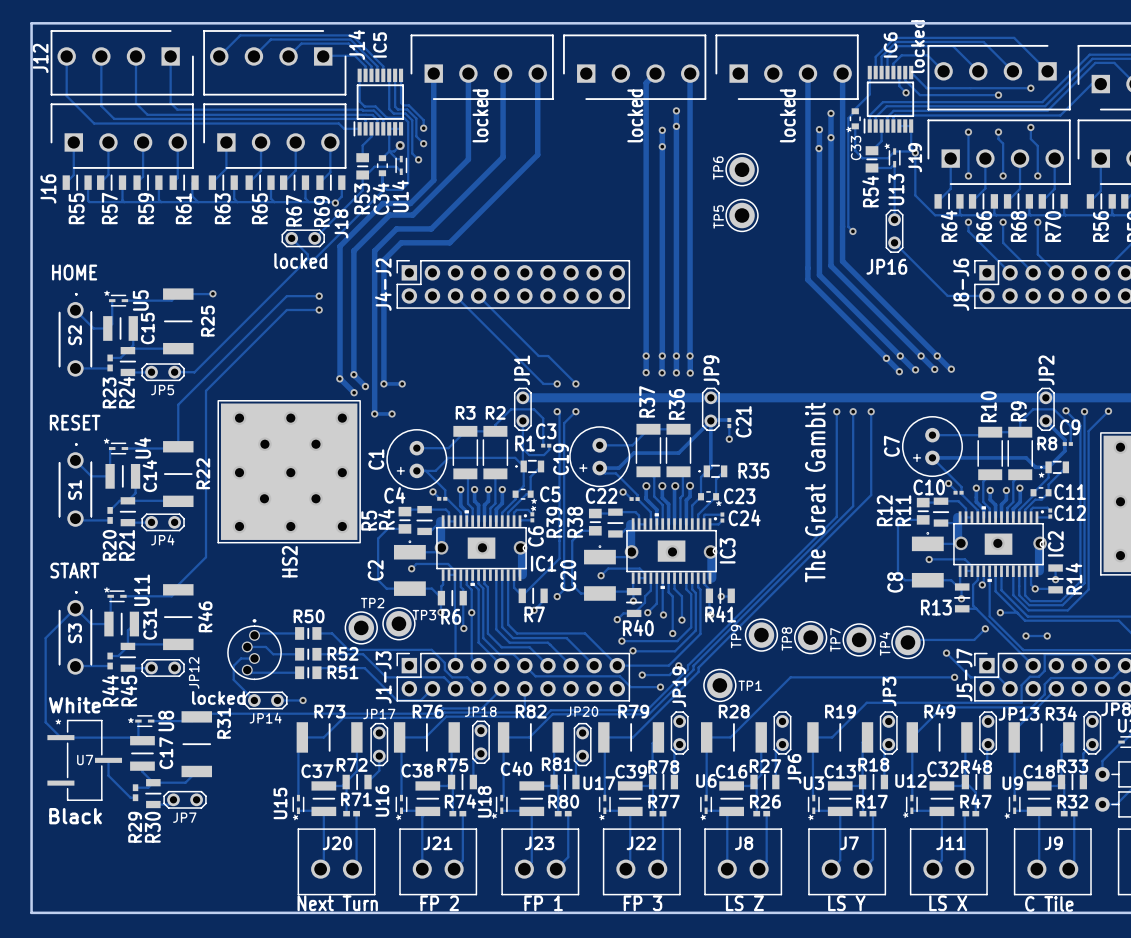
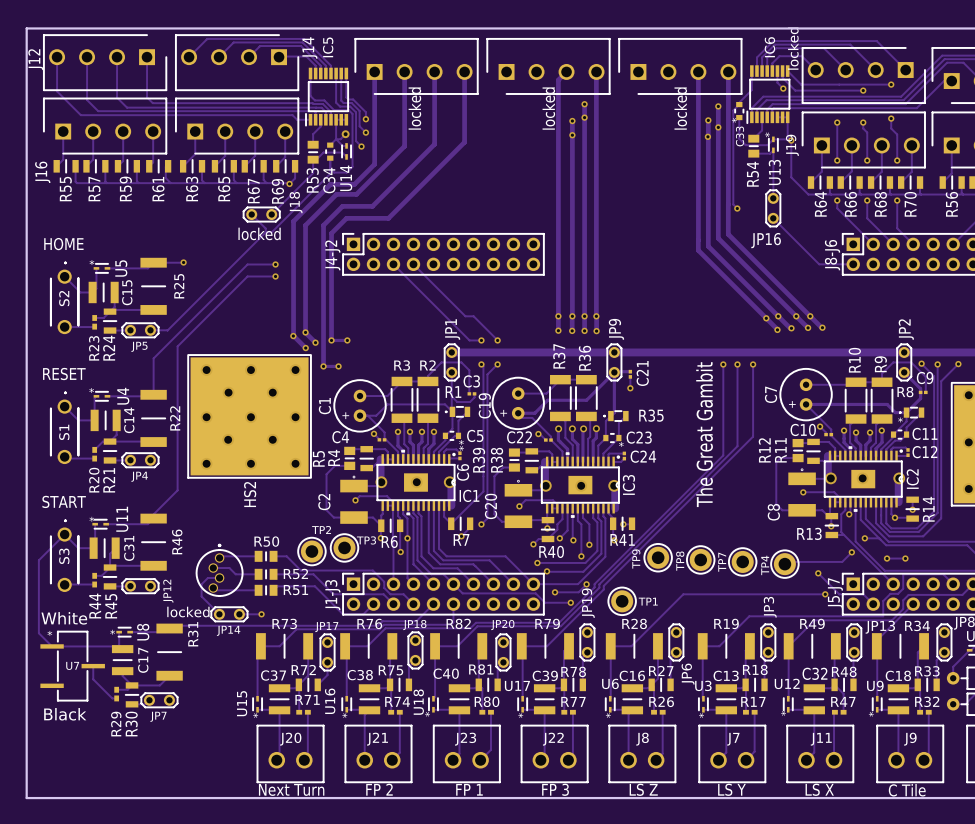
TP6: (742, 169) -> none
TP5: (742, 215) -> none

